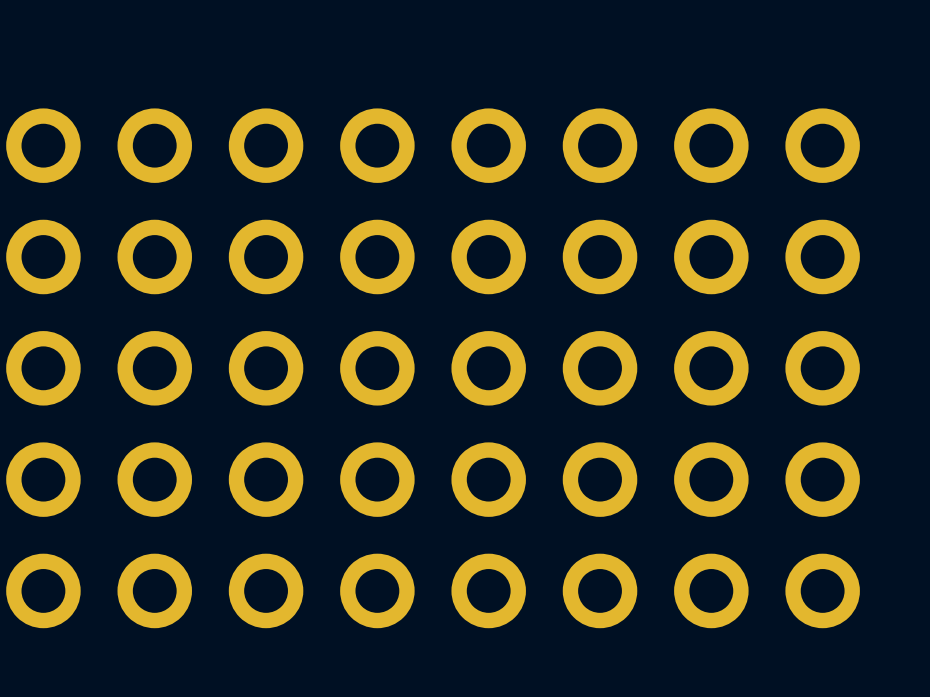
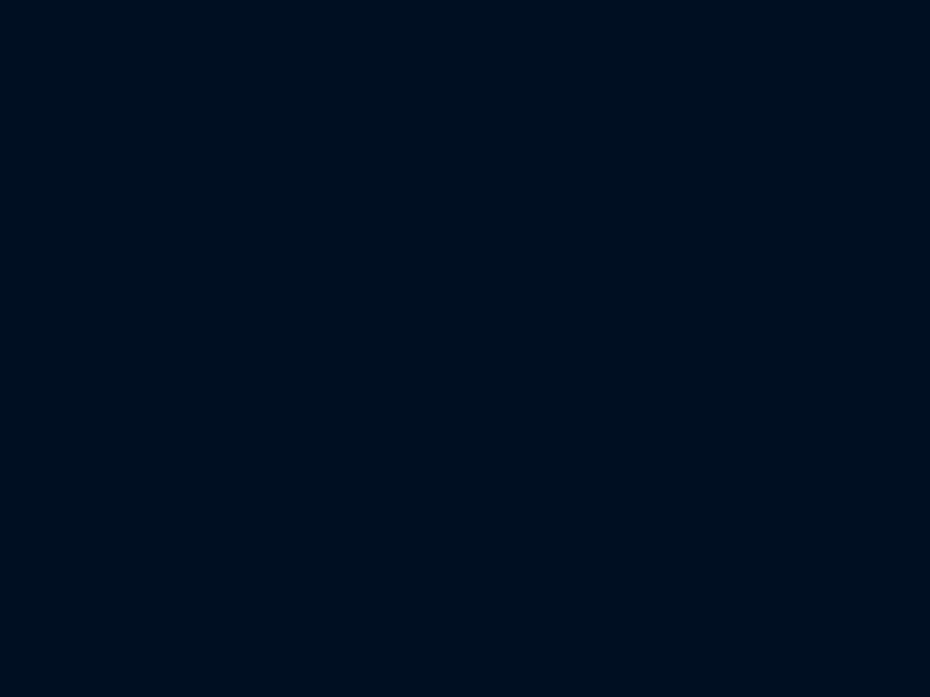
part: (43, 368) -> none
part: (154, 368) -> none
part: (266, 368) -> none
part: (377, 368) -> none
part: (488, 368) -> none
part: (600, 368) -> none
part: (711, 368) -> none
part: (822, 368) -> none

